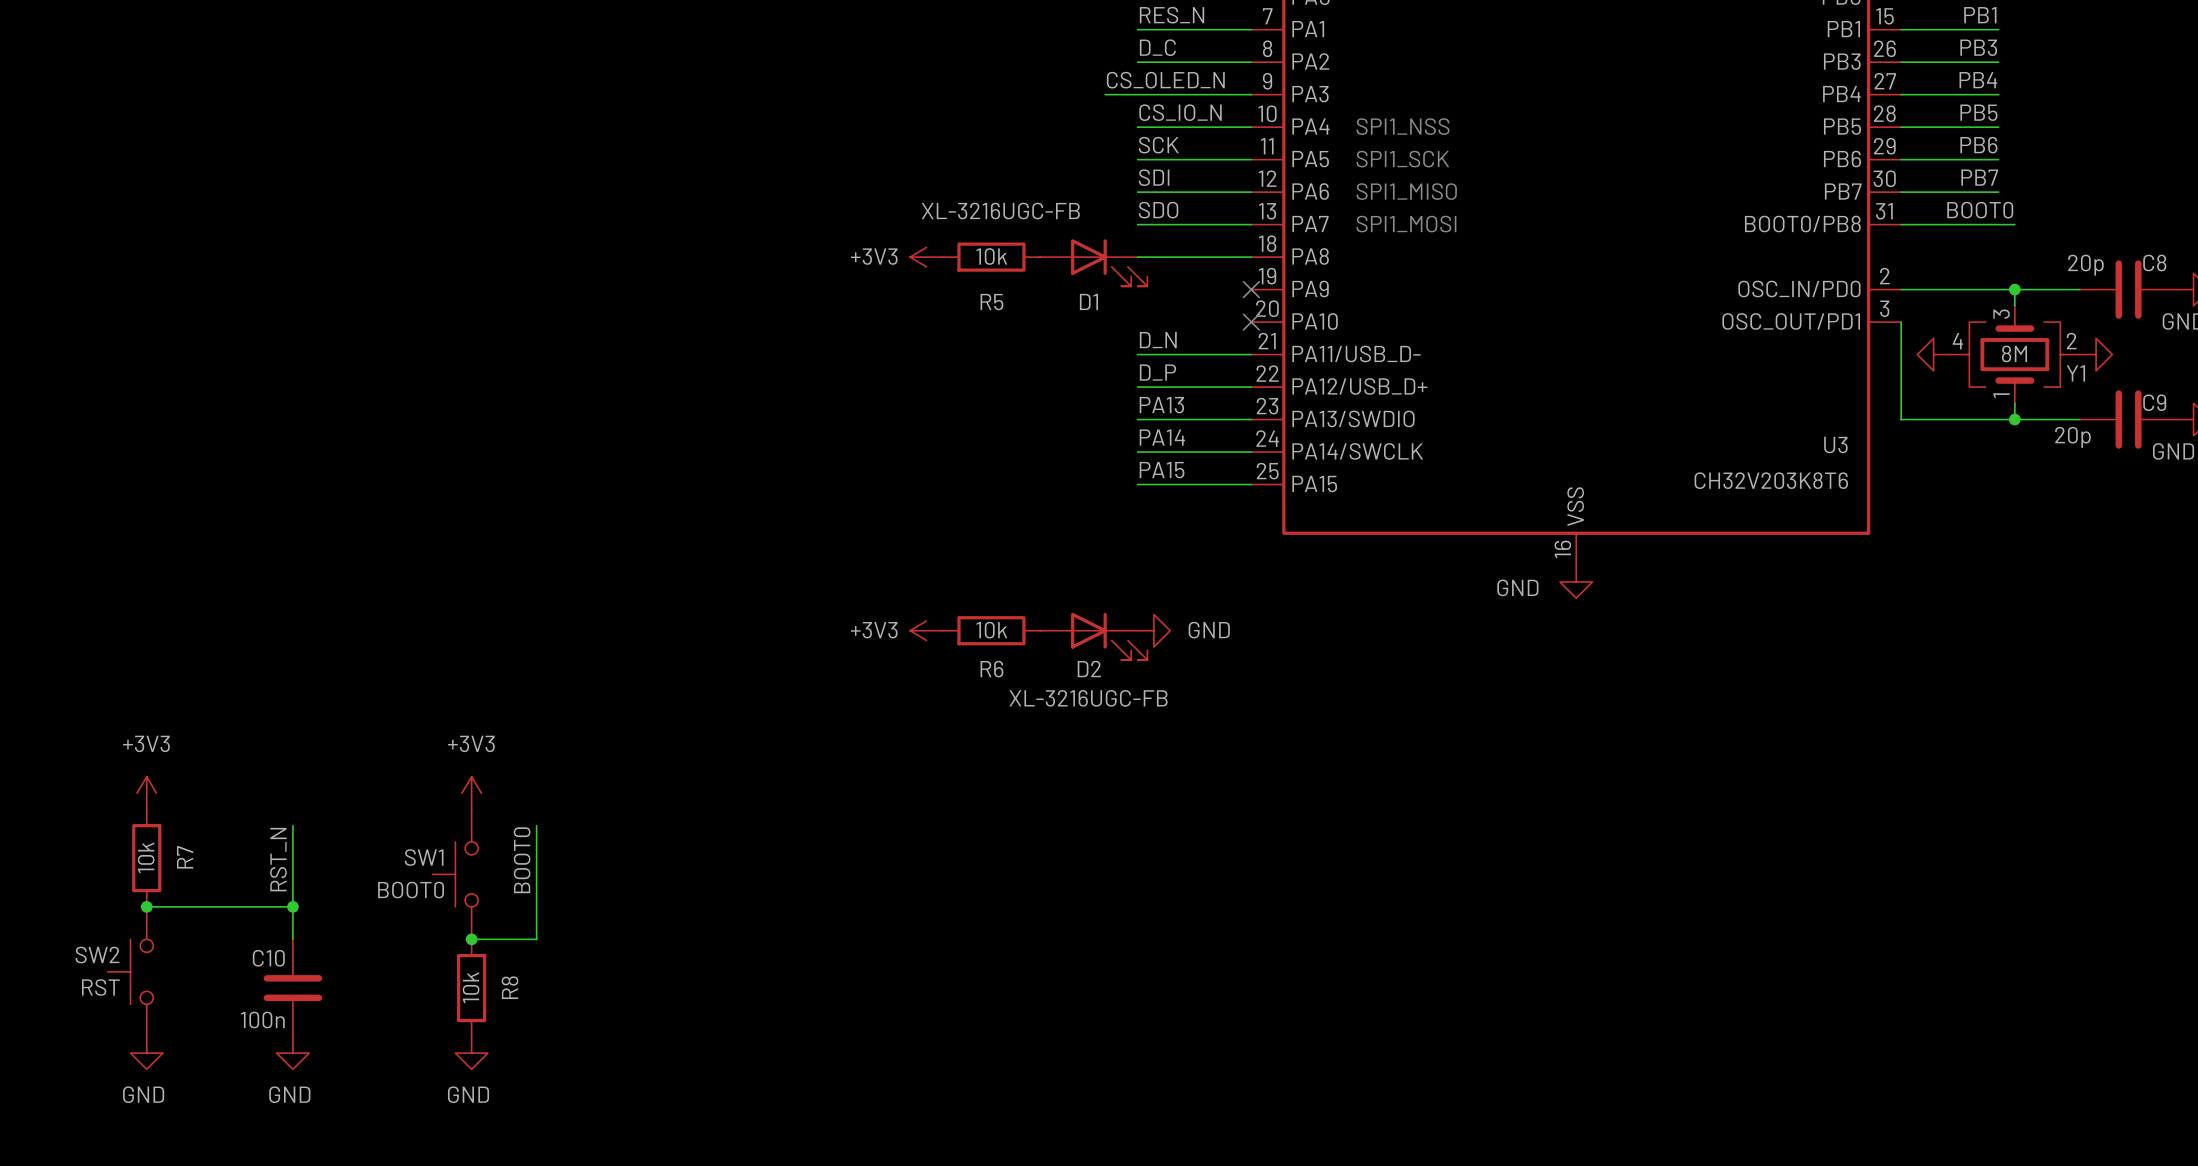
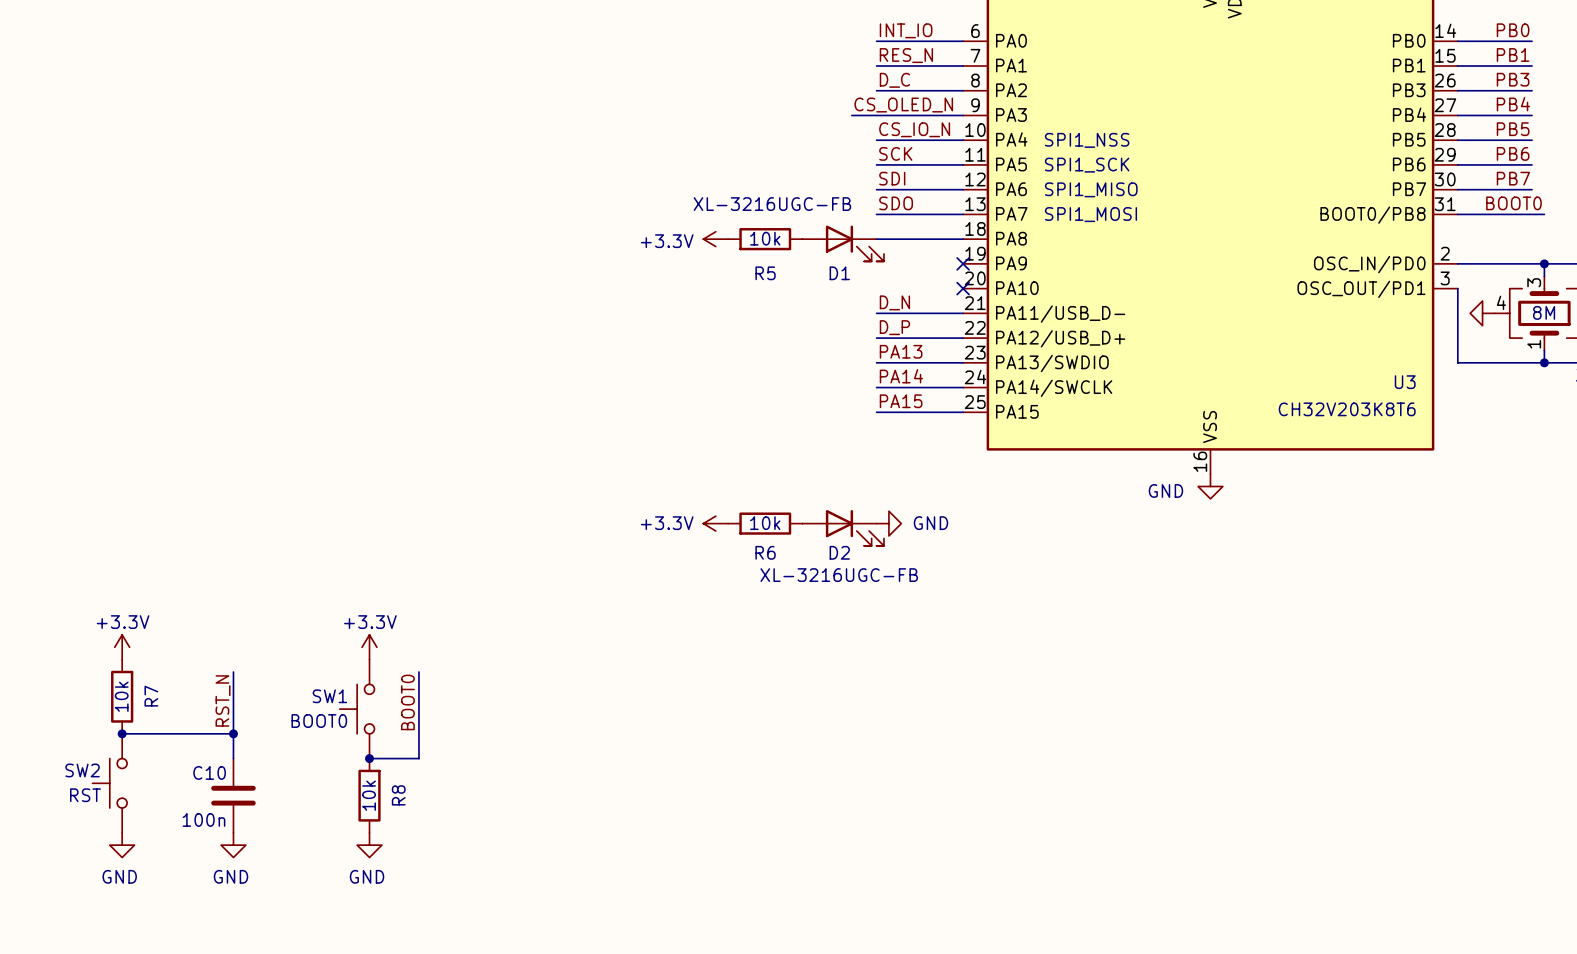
power symbol: +3V3 (926, 257) -> +3.3V (715, 239)
power symbol: +3V3 (926, 630) -> +3.3V (715, 523)
power symbol: +3V3 (146, 793) -> +3.3V (122, 647)
power symbol: +3V3 (471, 793) -> +3.3V (369, 647)

